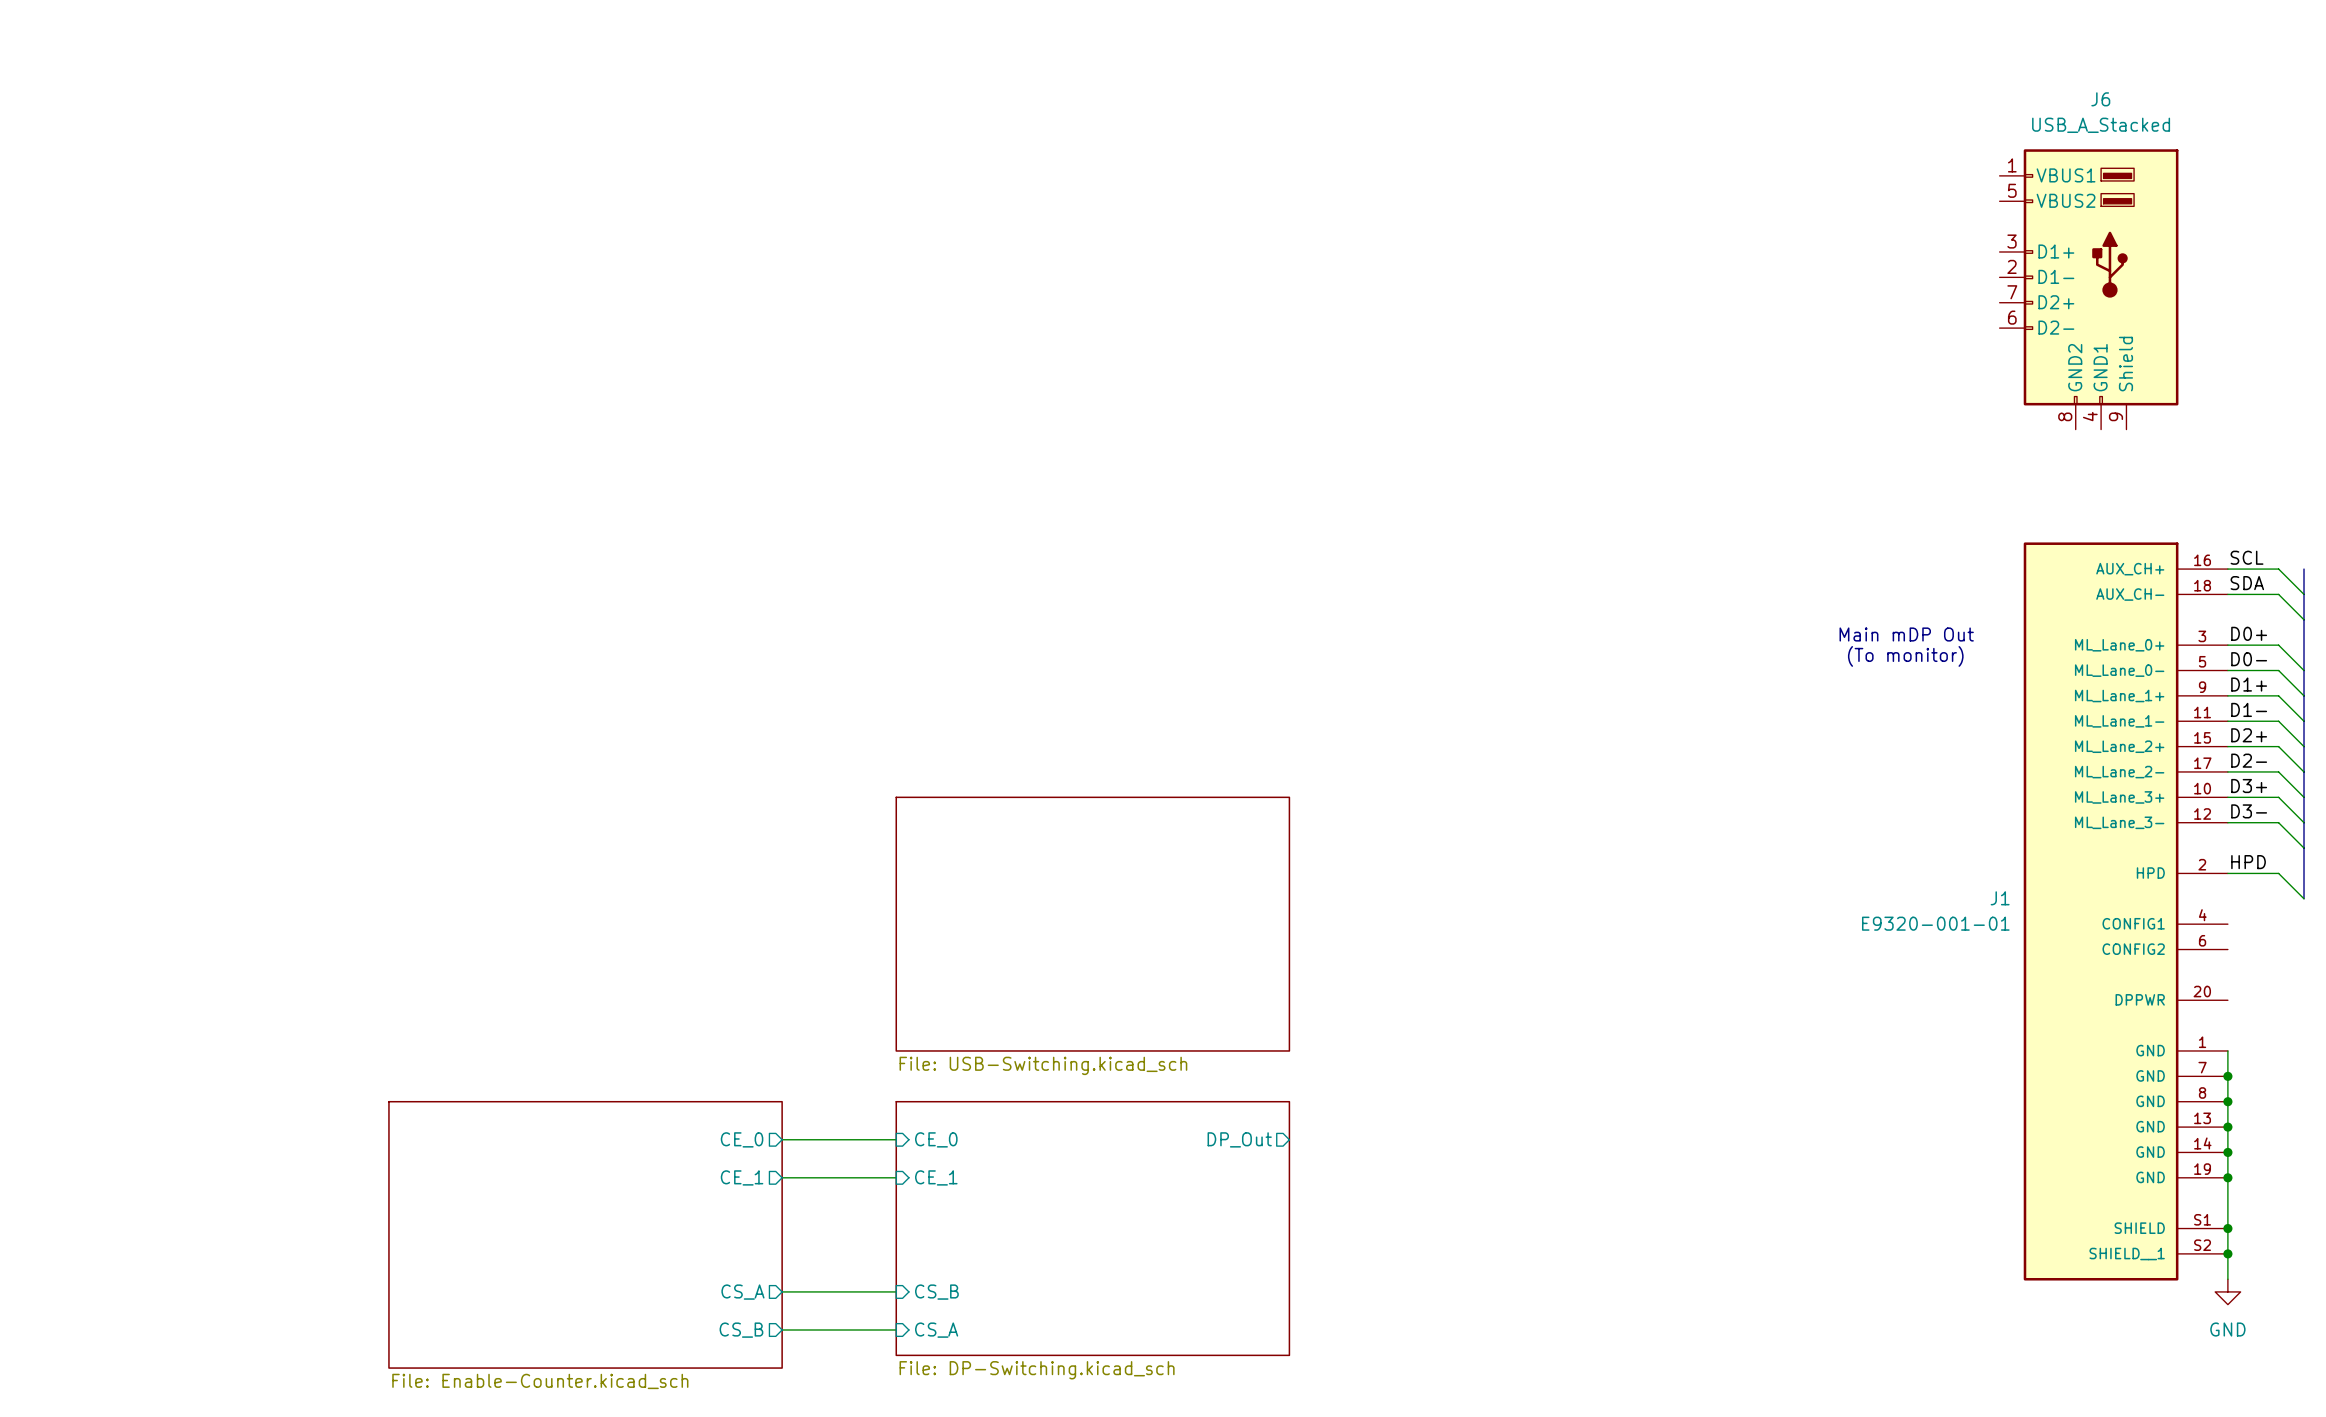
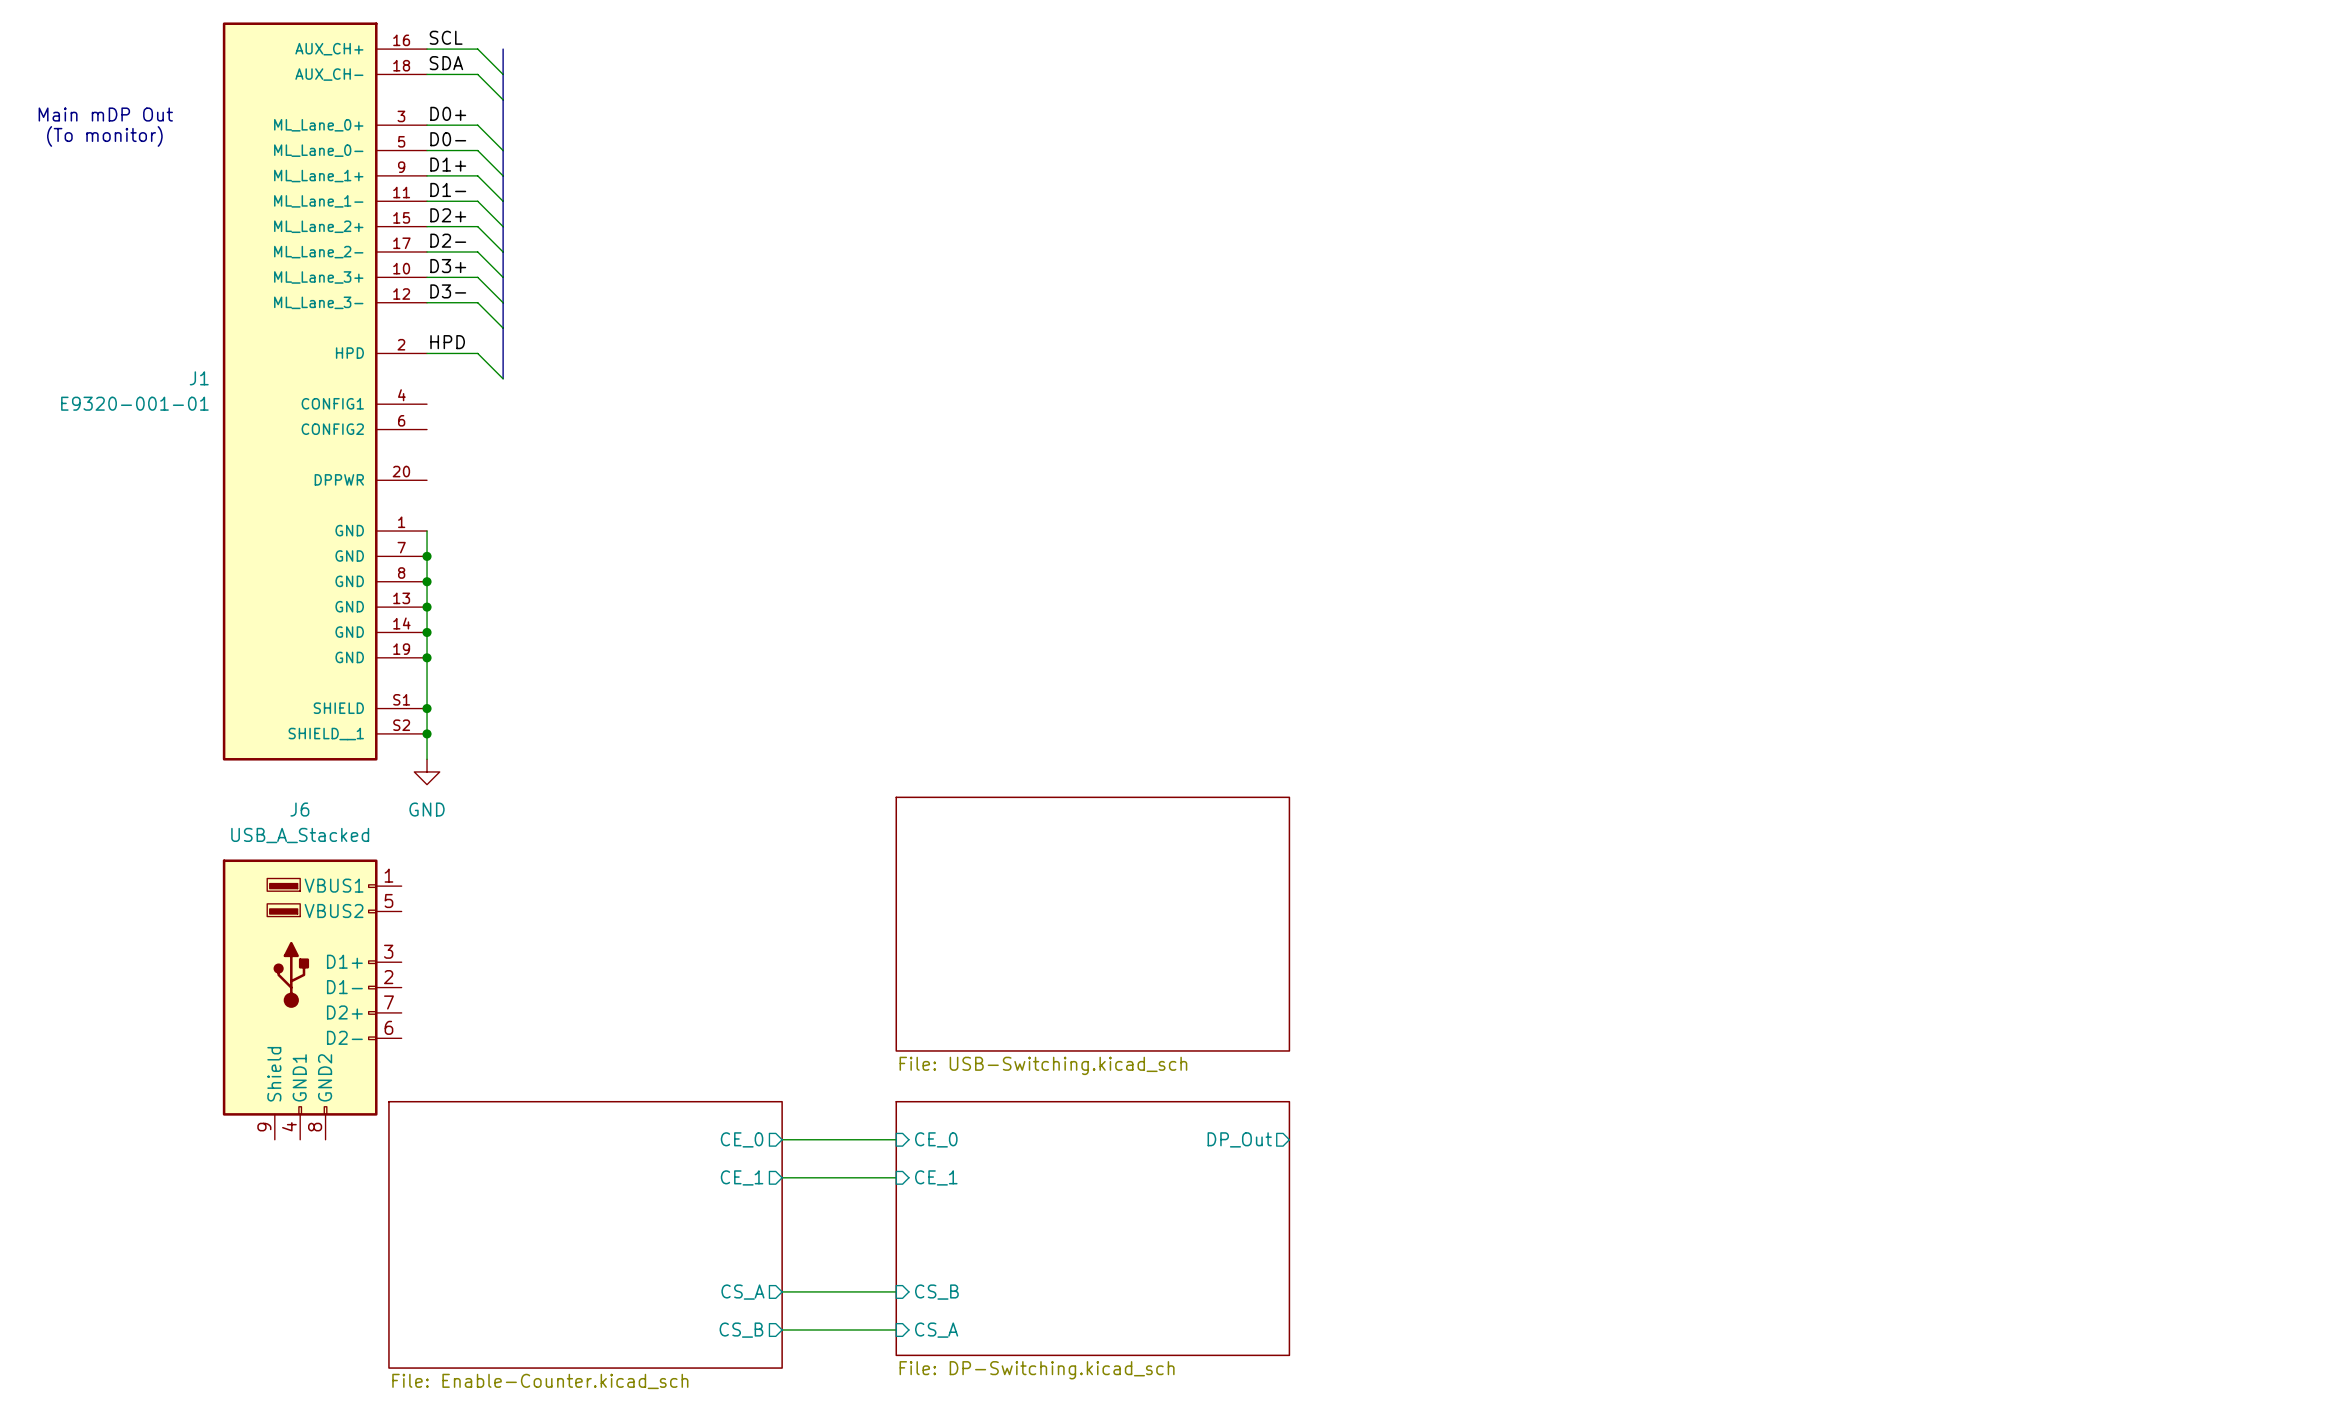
label: none -> SCL (446, 37)
wire: none -> (427, 49) (477, 49) (503, 74)
bus: none -> (503, 49) (503, 378)
label: none -> SDA (446, 63)
wire: none -> (427, 74) (477, 74) (503, 99)
label: none -> D0+ (448, 113)
text: none -> Main mDP Out (105, 114)
wire: none -> (427, 125) (477, 125) (503, 150)
text: none -> (To monitor) (104, 136)
label: none -> D0- (448, 139)
wire: none -> (427, 150) (477, 150) (503, 175)
label: none -> D1+ (448, 164)
wire: none -> (427, 175) (477, 175) (503, 201)
label: none -> D1- (448, 189)
wire: none -> (427, 201) (477, 201) (503, 226)
label: none -> D2+ (448, 215)
wire: none -> (427, 226) (477, 226) (503, 251)
label: none -> D2- (448, 240)
wire: none -> (427, 251) (477, 251) (503, 277)
label: none -> D3+ (448, 266)
wire: none -> (427, 277) (477, 277) (503, 302)
J6 flip: as is (2101, 277) -> left-right (300, 987)
J6 position: (2089, 289) -> (312, 999)
label: none -> D3- (448, 291)
wire: none -> (427, 302) (477, 302) (503, 328)
label: none -> HPD (447, 342)
wire: none -> (427, 353) (477, 353) (503, 378)
wire: none -> (427, 531) (427, 759)
junction: none -> (427, 556)
label: SCL (2247, 557) -> none
wire: (2227, 569) (2278, 569) (2304, 594) -> none
bus: (2304, 569) (2304, 898) -> none
junction: none -> (427, 581)
label: SDA (2247, 583) -> none
wire: (2227, 594) (2278, 594) (2304, 619) -> none
junction: none -> (427, 607)
junction: none -> (427, 632)
label: D0+ (2249, 633) -> none
text: Main mDP Out (1906, 634) -> none
wire: (2227, 645) (2278, 645) (2304, 670) -> none
text: (To monitor) (1905, 656) -> none
junction: none -> (427, 657)
label: D0- (2249, 659) -> none
wire: (2227, 670) (2278, 670) (2304, 695) -> none
label: D1+ (2249, 684) -> none
wire: (2227, 695) (2278, 695) (2304, 721) -> none
junction: none -> (427, 708)
label: D1- (2249, 709) -> none
wire: (2227, 721) (2278, 721) (2304, 746) -> none
junction: none -> (427, 733)
label: D2+ (2249, 735) -> none
wire: (2227, 746) (2278, 746) (2304, 771) -> none
label: D2- (2249, 760) -> none
power symbol: none -> GND (427, 771)
wire: (2227, 771) (2278, 771) (2304, 797) -> none
label: D3+ (2249, 786) -> none
wire: (2227, 797) (2278, 797) (2304, 822) -> none
label: D3- (2249, 811) -> none
wire: (2227, 822) (2278, 822) (2304, 848) -> none
label: HPD (2248, 862) -> none
wire: (2227, 873) (2278, 873) (2304, 898) -> none
J1 position: (2125, 911) -> (324, 391)
wire: (2227, 1050) (2227, 1279) -> none
junction: (2227, 1076) -> none
junction: (2227, 1101) -> none
junction: (2227, 1127) -> none
junction: (2227, 1152) -> none
junction: (2227, 1177) -> none
junction: (2227, 1228) -> none
junction: (2227, 1253) -> none
power symbol: GND (2227, 1291) -> none

